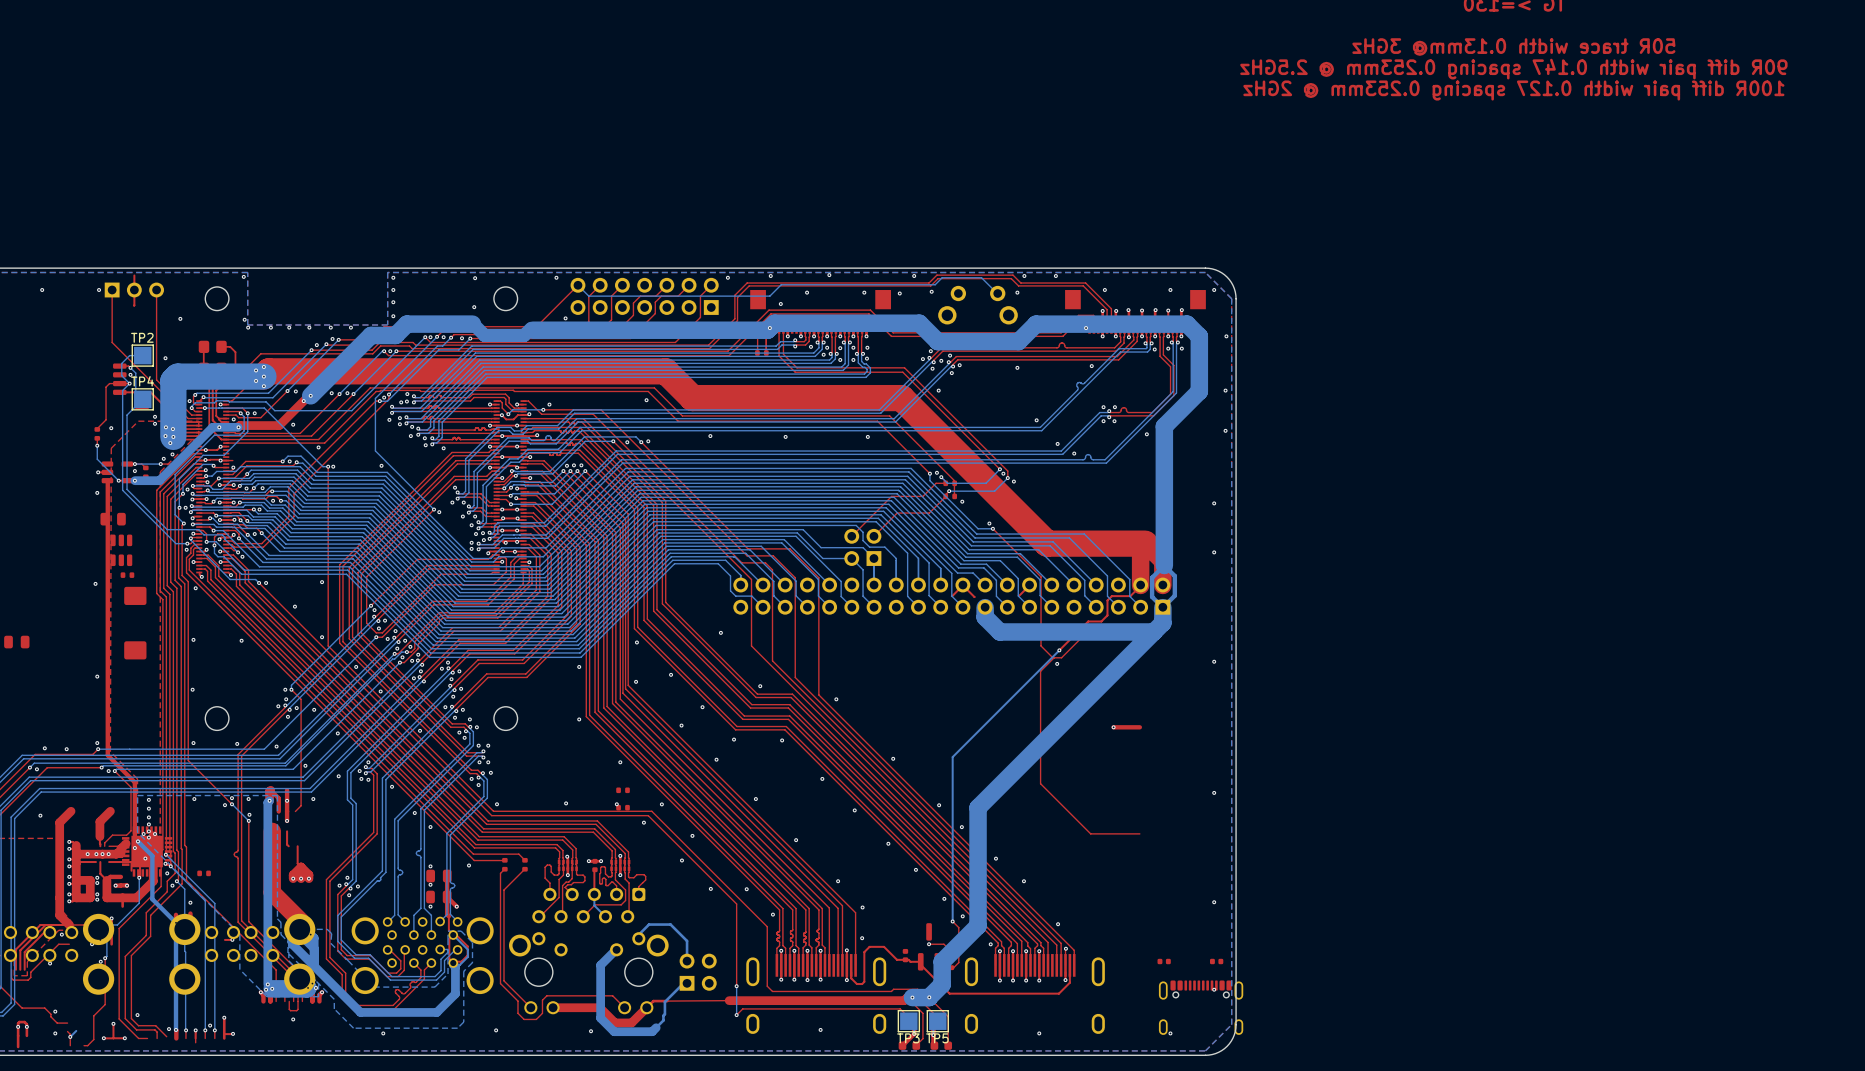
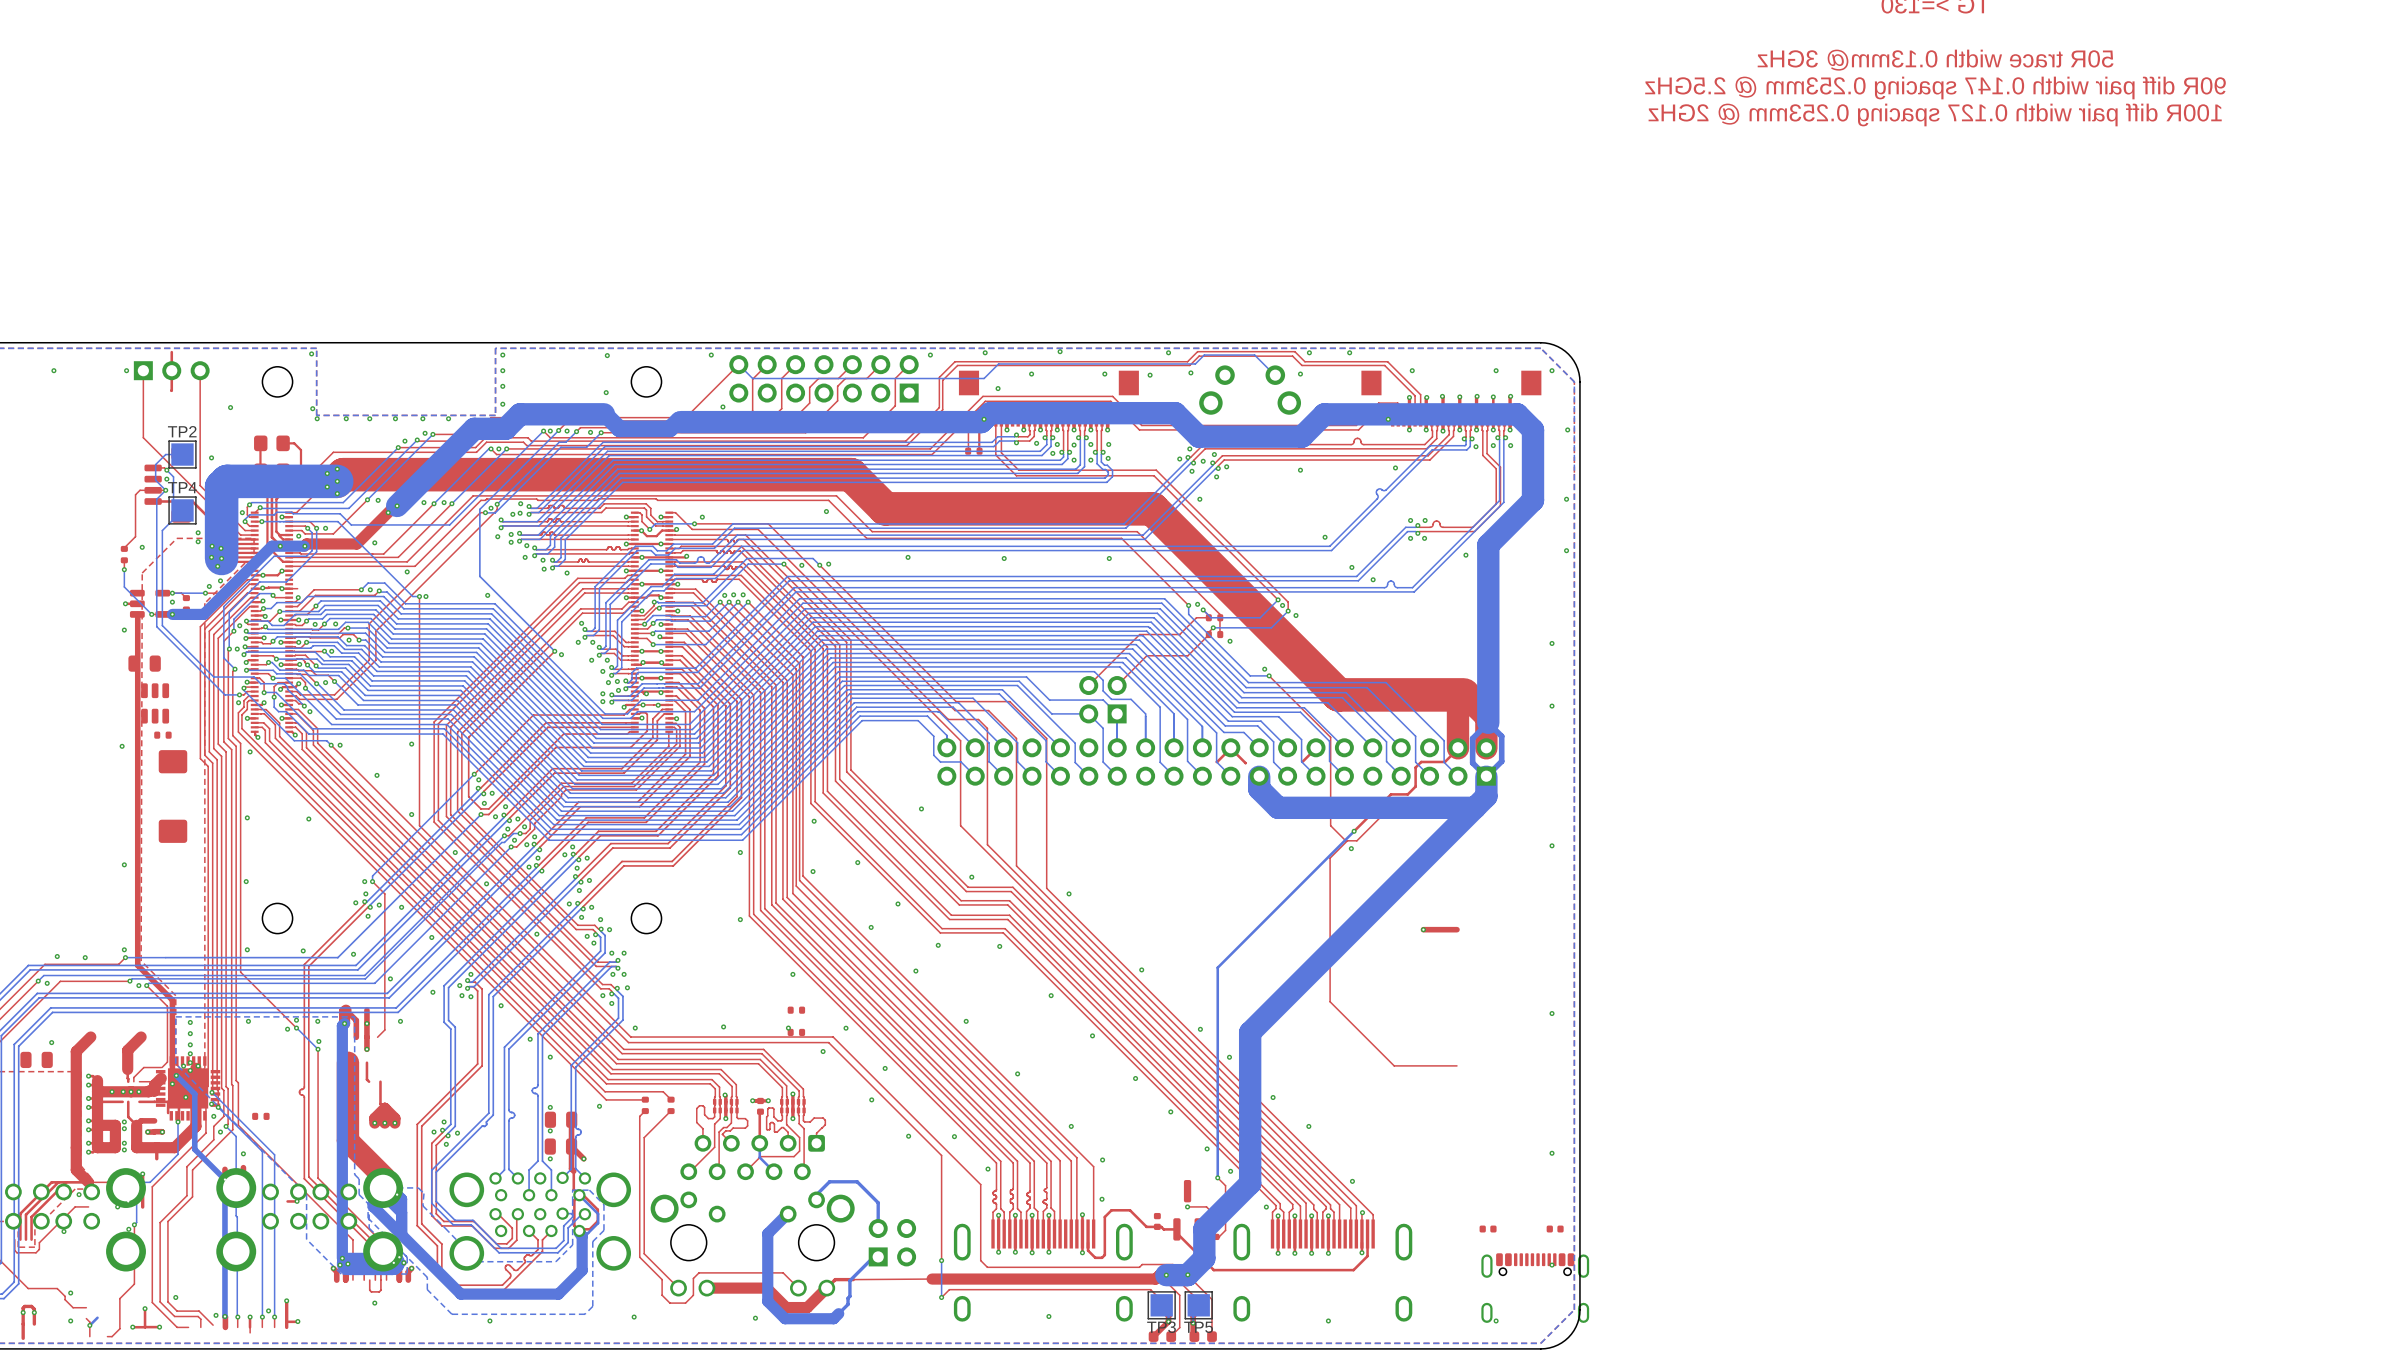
part position: (16, 642) -> (36, 1059)

